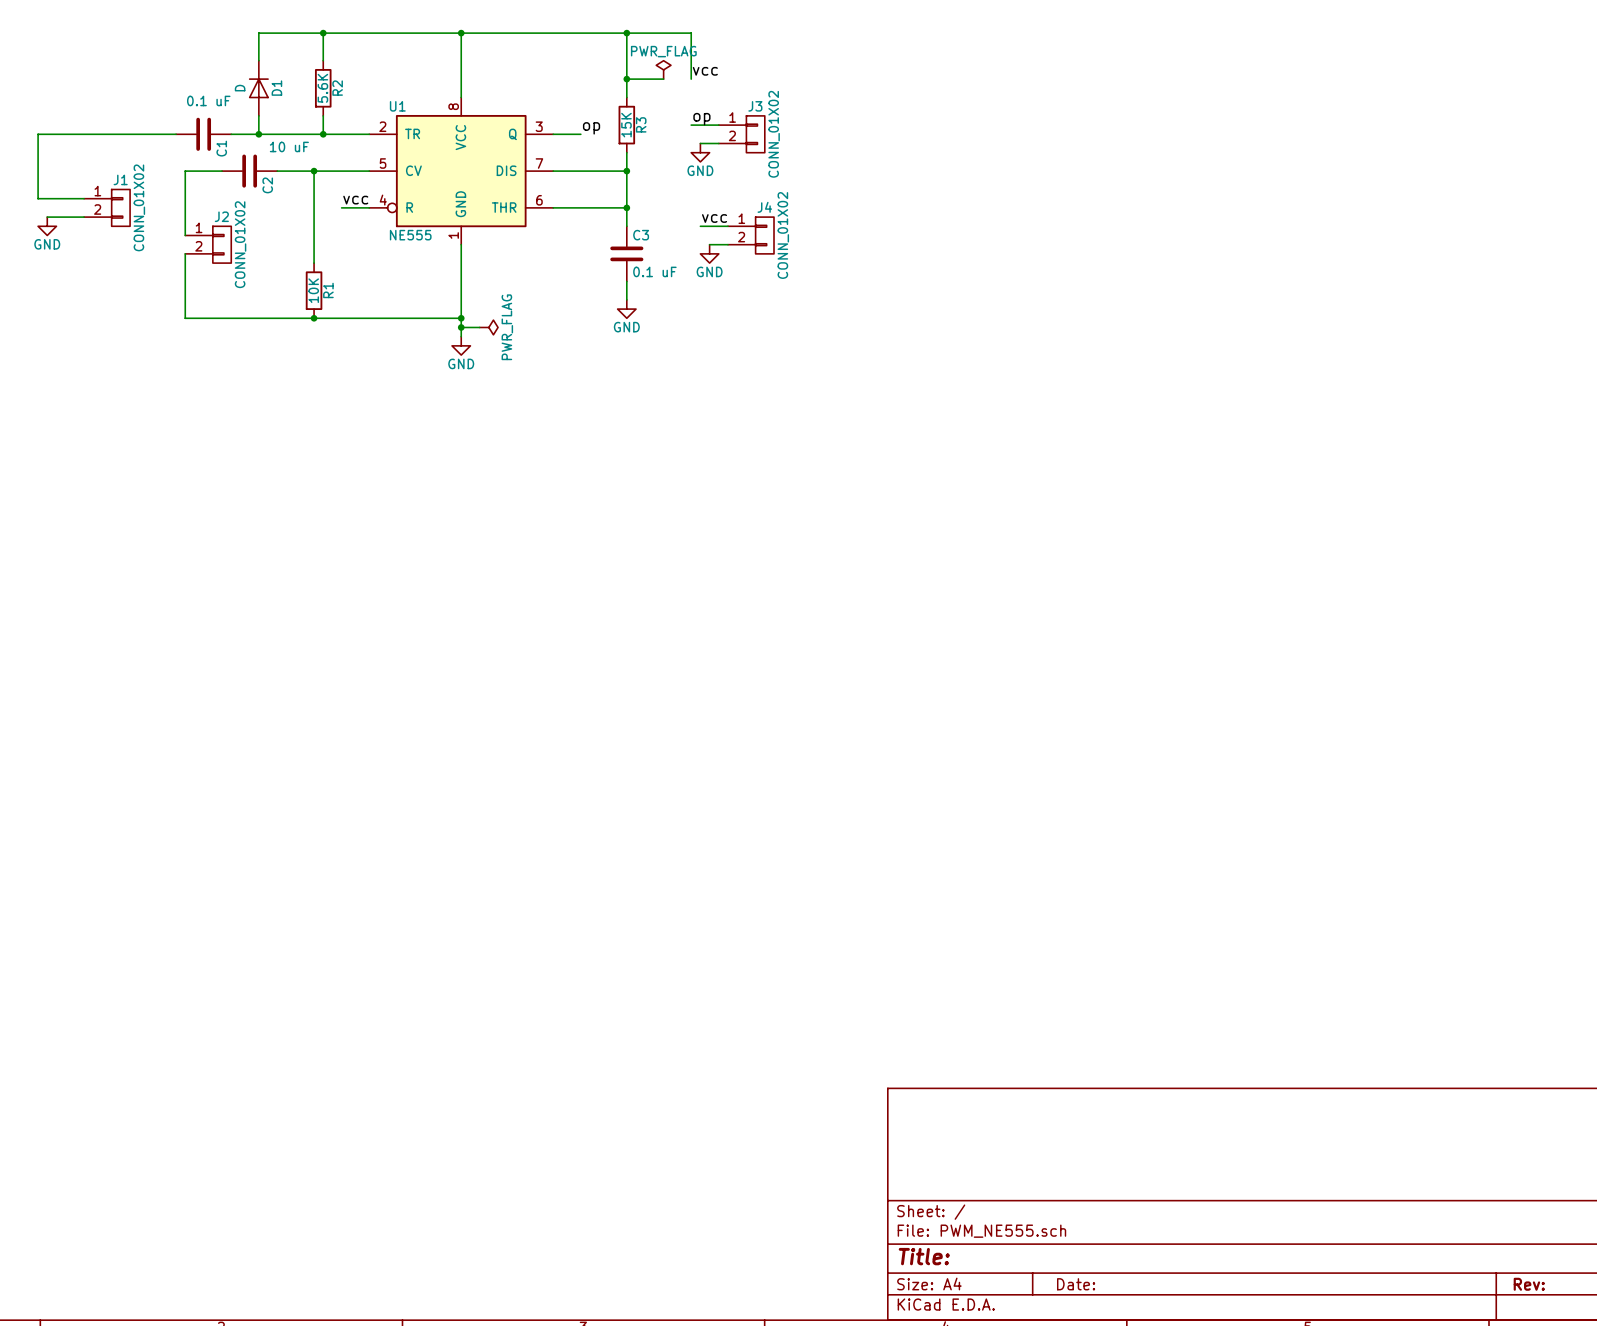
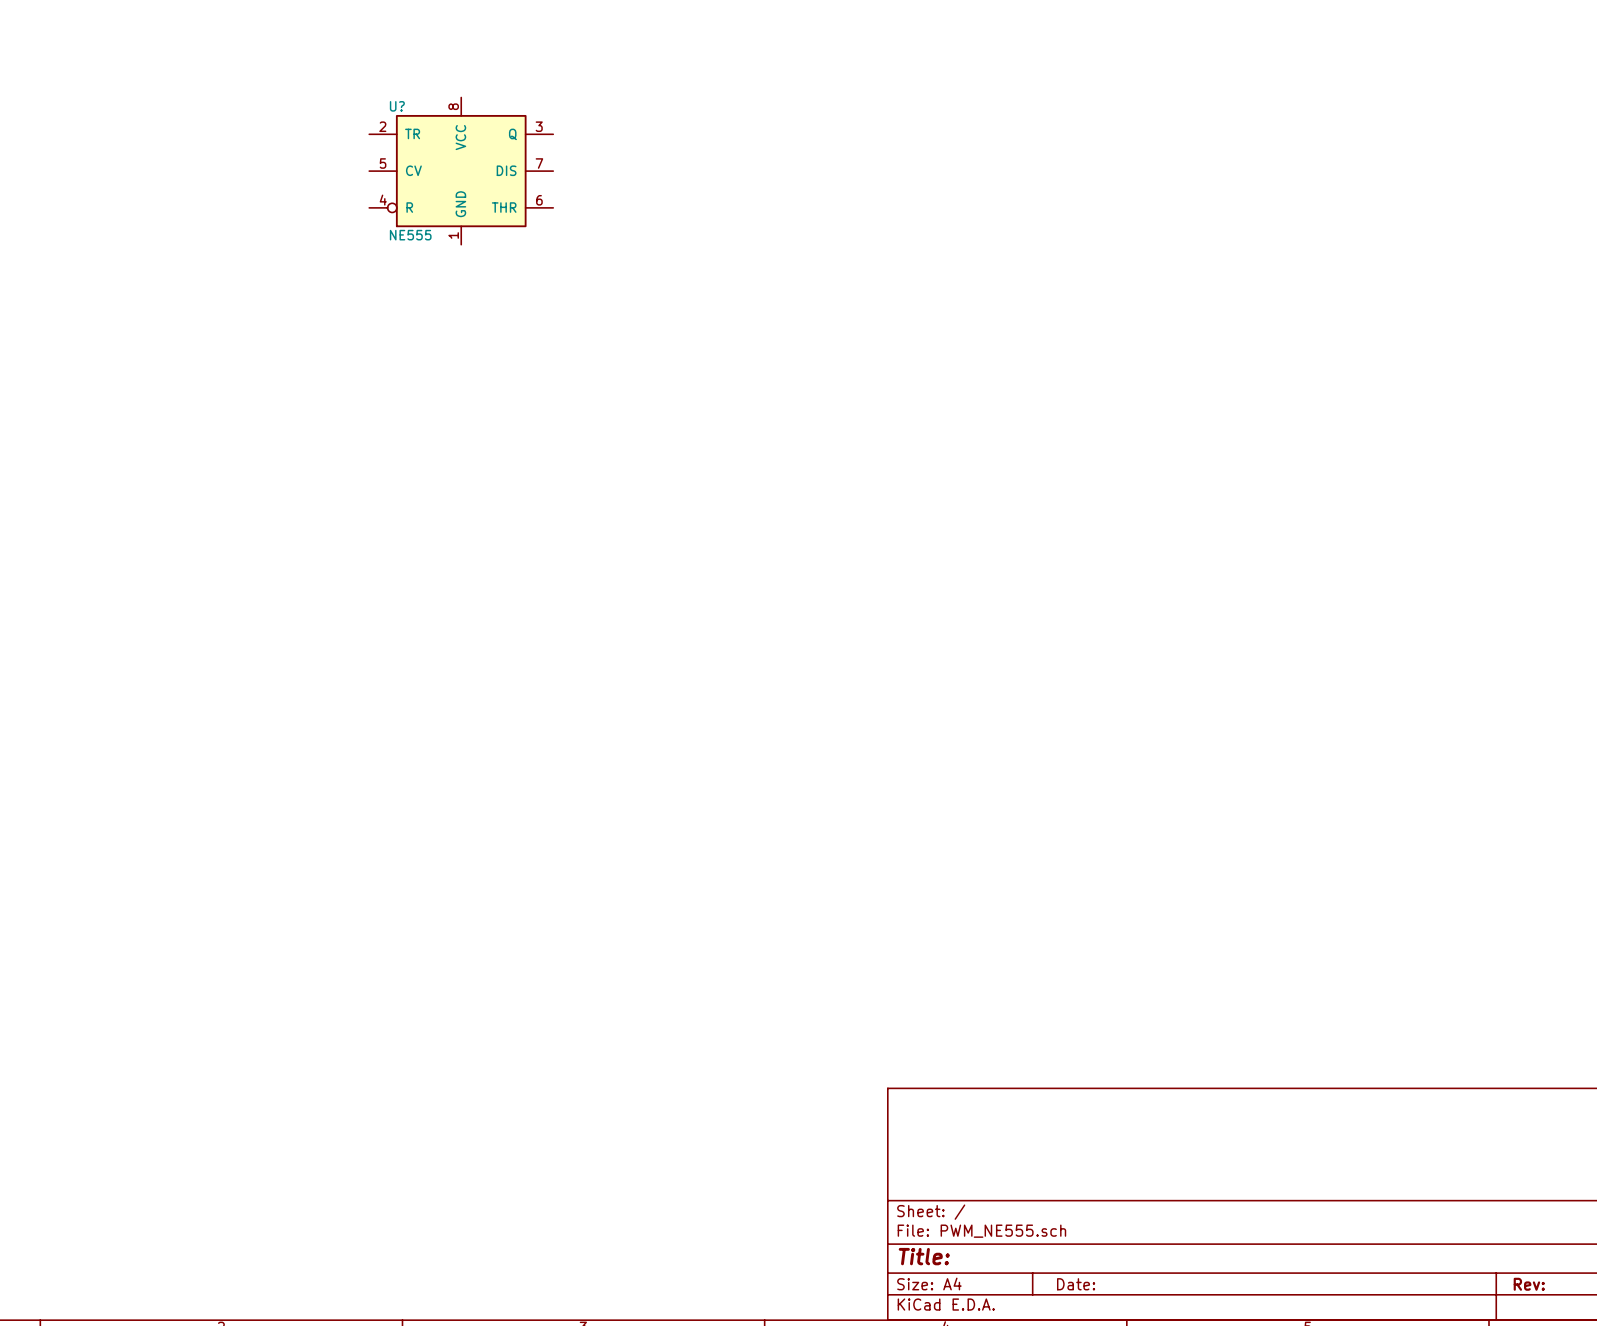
wire: (323, 33) (323, 60) -> none
junction: (323, 33) -> none
wire: (461, 33) (461, 97) -> none
junction: (461, 33) -> none
wire: (626, 33) (626, 97) -> none
junction: (626, 33) -> none
wire: (258, 60) (258, 33) (691, 33) (691, 79) -> none
power symbol: PWR_FLAG (663, 69) -> none
label: vcc (705, 71) -> none
wire: (626, 79) (663, 79) -> none
junction: (626, 79) -> none
D1: D (258, 88) -> none
R2: 5.6K (323, 88) -> none
U1 name: U1 (397, 106) -> U? (397, 106)
wire: (258, 115) (258, 134) -> none
wire: (323, 115) (323, 134) -> none
label: op (701, 119) -> none
R3: 15K (626, 125) -> none
wire: (691, 125) (718, 125) -> none
label: op (591, 128) -> none
wire: (176, 134) (38, 134) (38, 198) (84, 198) -> none
C1: 0.1 uF (203, 134) -> none
wire: (231, 134) (369, 134) -> none
junction: (258, 134) -> none
junction: (323, 134) -> none
wire: (553, 134) (580, 134) -> none
J3: CONN_01X02 (741, 134) -> none
wire: (700, 143) (718, 143) -> none
wire: (626, 152) (626, 226) -> none
power symbol: GND (700, 152) -> none
wire: (222, 171) (185, 171) (185, 235) -> none
C2: 10 uF (249, 171) -> none
wire: (277, 171) (369, 171) -> none
wire: (314, 171) (314, 263) -> none
junction: (314, 171) -> none
wire: (553, 171) (626, 171) -> none
junction: (626, 171) -> none
label: vcc (355, 200) -> none
J1: CONN_01X02 (107, 207) -> none
wire: (341, 207) (369, 207) -> none
wire: (553, 207) (626, 207) -> none
junction: (626, 207) -> none
wire: (47, 217) (84, 217) -> none
label: vcc (714, 218) -> none
power symbol: GND (47, 226) -> none
wire: (700, 226) (728, 226) -> none
J4: CONN_01X02 (751, 235) -> none
J2: CONN_01X02 (208, 244) -> none
wire: (461, 244) (461, 336) -> none
wire: (709, 244) (728, 244) -> none
wire: (185, 253) (185, 318) (461, 318) -> none
C3: 0.1 uF (626, 253) -> none
power symbol: GND (709, 253) -> none
wire: (626, 281) (626, 299) -> none
R1: 10K (314, 290) -> none
power symbol: GND (626, 309) -> none
junction: (314, 318) -> none
junction: (461, 318) -> none
wire: (461, 327) (479, 327) -> none
junction: (461, 327) -> none
power symbol: PWR_FLAG (488, 327) -> none
power symbol: GND (461, 345) -> none

